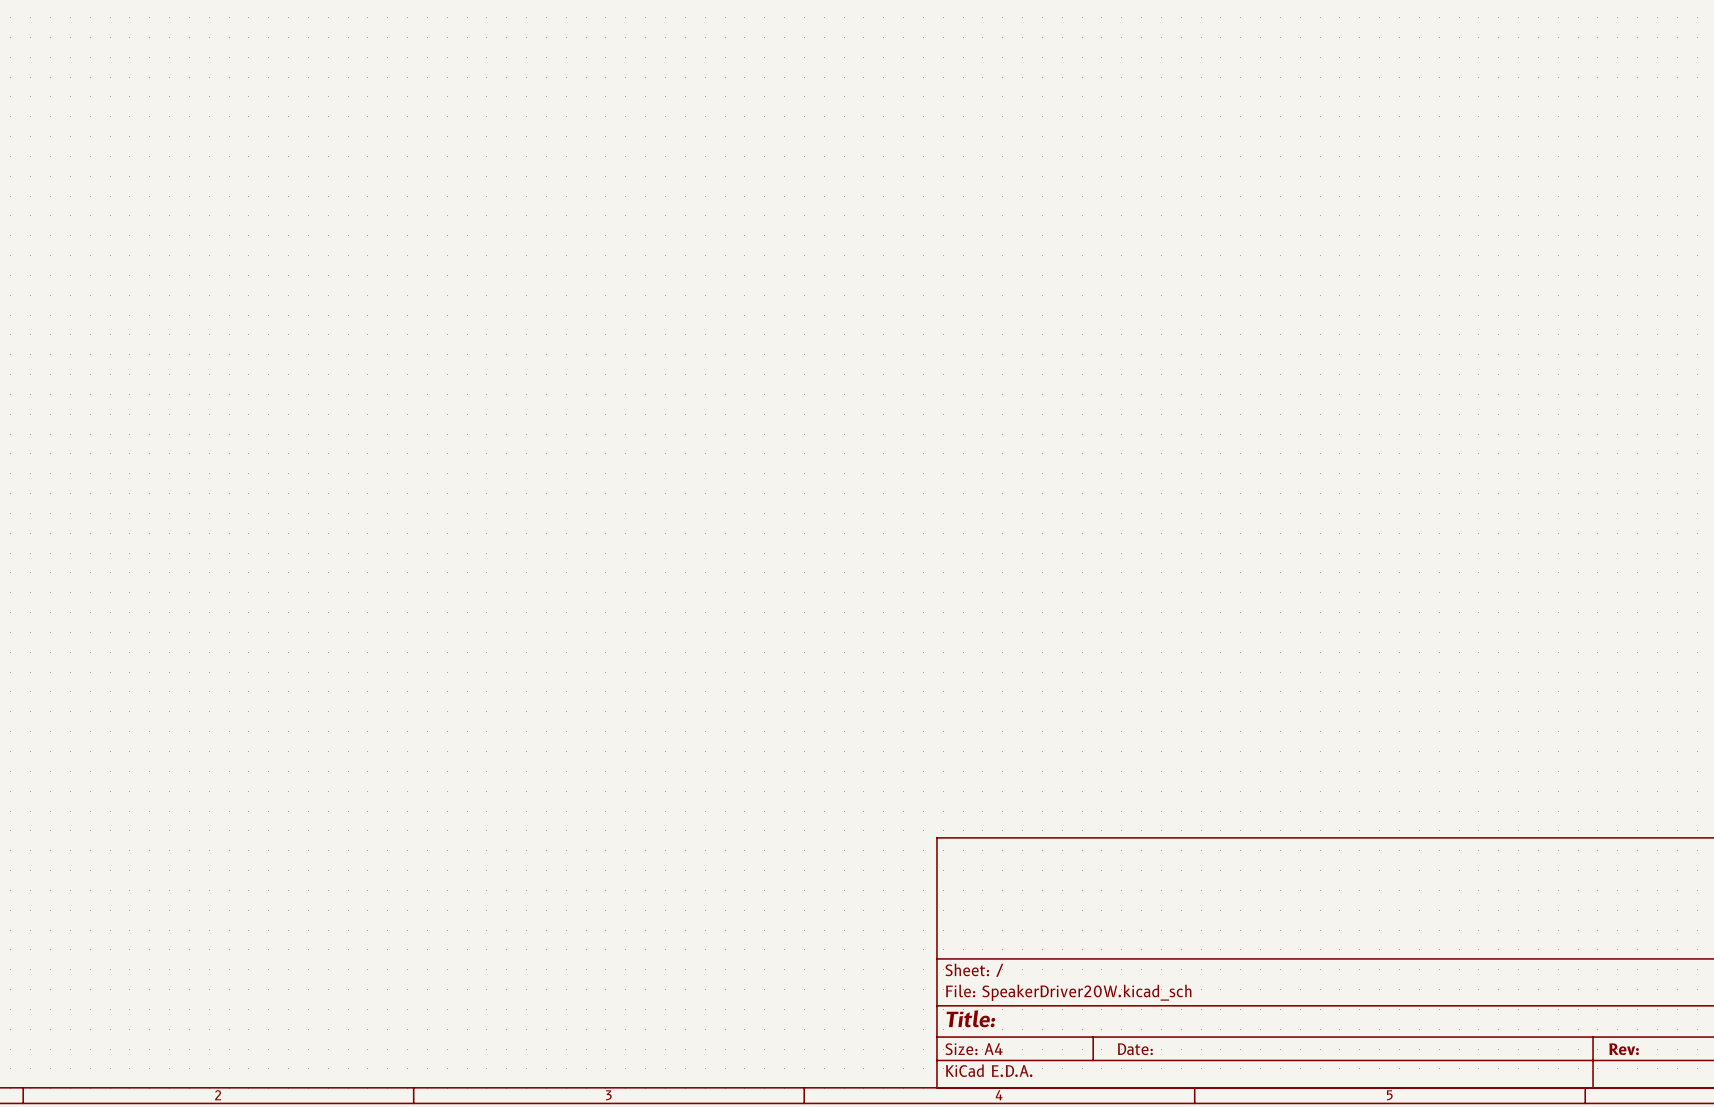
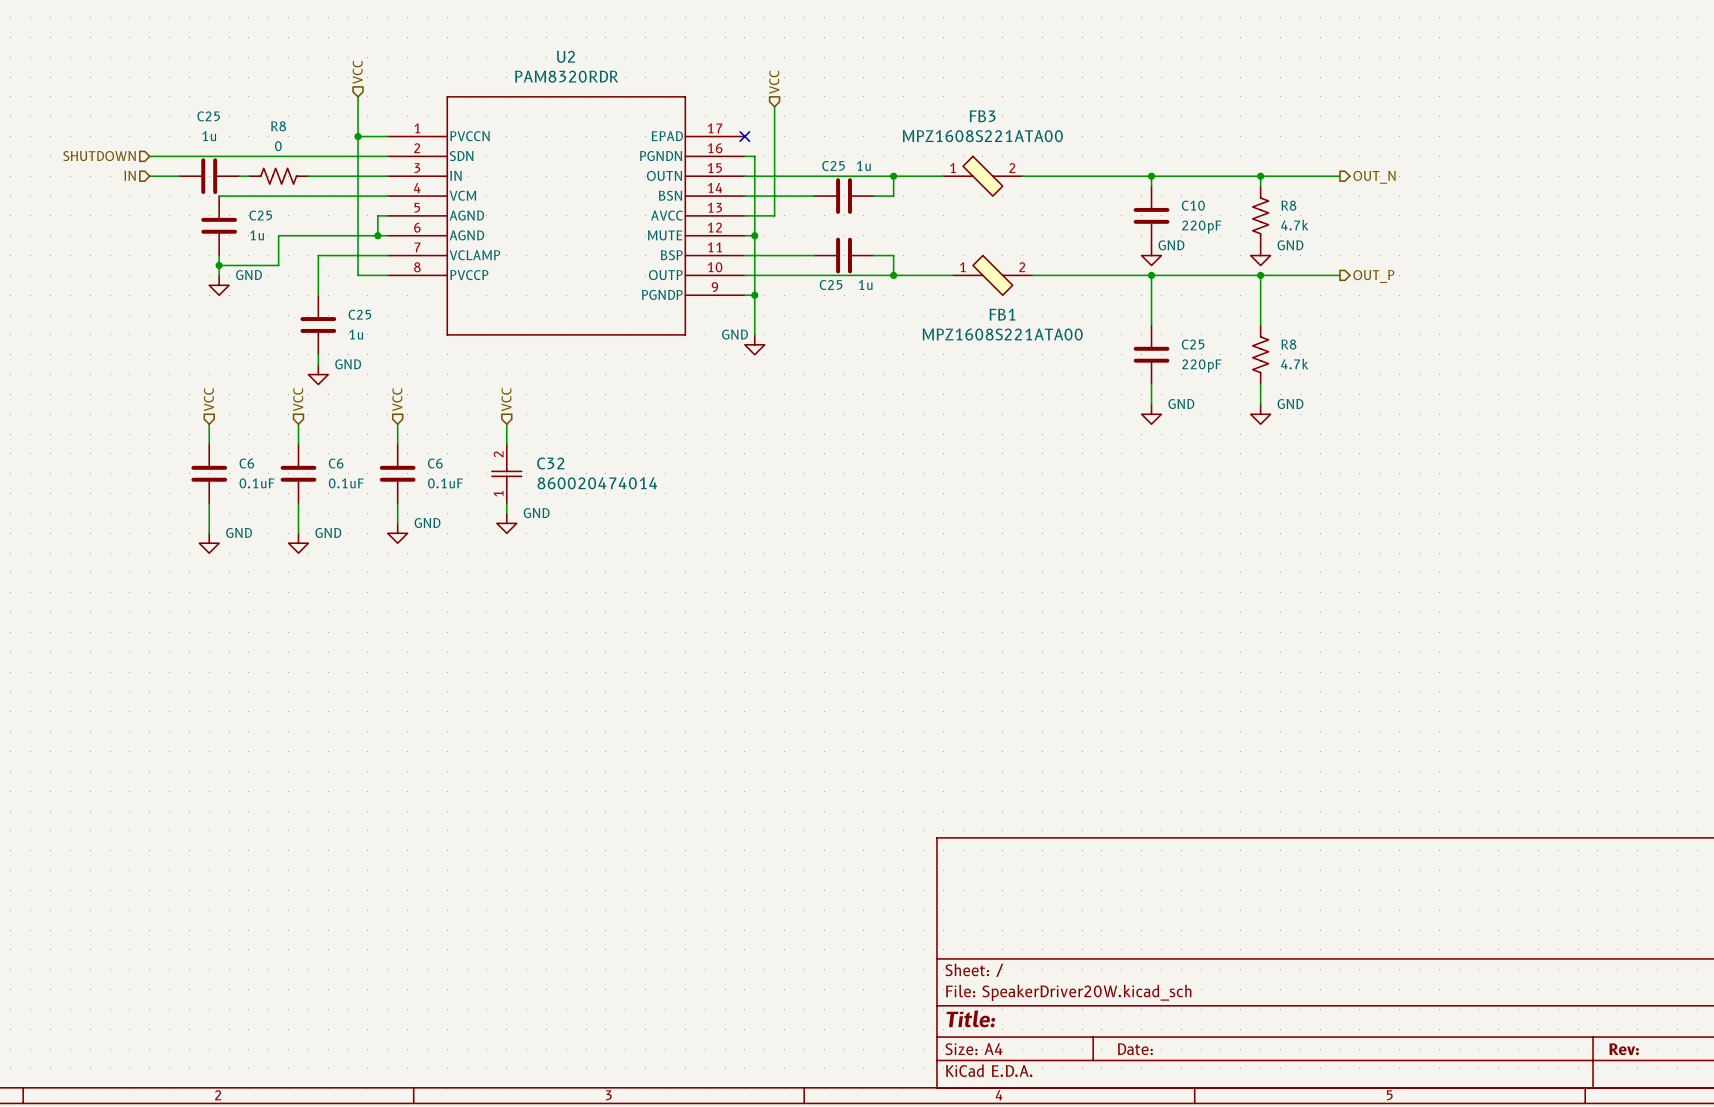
hierarchical label: none -> VCC (357, 72)
hierarchical label: none -> VCC (774, 82)
wire: none -> (358, 96) (358, 275) (387, 275)
wire: none -> (774, 106) (774, 215) (744, 215)
wire: none -> (358, 136) (387, 136)
junction: none -> (358, 136)
no-connect mark: none -> (744, 136)
hierarchical label: none -> SHUTDOWN (99, 156)
wire: none -> (149, 156) (387, 156)
wire: none -> (744, 156) (754, 156) (754, 334)
hierarchical label: none -> IN (130, 175)
wire: none -> (149, 176) (179, 176)
C25: none -> 1u (209, 176)
wire: none -> (238, 176) (248, 176)
R8: none -> 0 (278, 176)
wire: none -> (308, 176) (387, 176)
wire: none -> (744, 176) (943, 176)
wire: none -> (893, 176) (893, 196) (873, 196)
junction: none -> (893, 176)
FB3: none -> MPZ1608S221ATA00 (982, 176)
wire: none -> (1022, 176) (1339, 176)
wire: none -> (1151, 176) (1151, 186)
junction: none -> (1151, 176)
wire: none -> (1260, 176) (1260, 186)
junction: none -> (1260, 176)
hierarchical label: none -> OUT_N (1374, 177)
wire: none -> (219, 196) (387, 196)
wire: none -> (744, 196) (814, 196)
C25: none -> 1u (844, 196)
wire: none -> (387, 215) (377, 215) (377, 235)
U2: none -> PAM8320RDR (566, 215)
C10: none -> 220pF (1151, 215)
R8: none -> 4.7k (1260, 215)
C25: none -> 1u (219, 225)
junction: none -> (377, 235)
wire: none -> (387, 235) (278, 235) (278, 265) (219, 265)
wire: none -> (744, 235) (754, 235)
junction: none -> (754, 235)
wire: none -> (219, 255) (219, 275)
wire: none -> (387, 255) (318, 255) (318, 295)
wire: none -> (744, 255) (814, 255)
C25: none -> 1u (844, 255)
wire: none -> (873, 255) (893, 255) (893, 275)
power symbol: none -> GND (1151, 255)
power symbol: none -> GND (1260, 255)
junction: none -> (219, 265)
wire: none -> (744, 275) (953, 275)
junction: none -> (893, 275)
FB1: none -> MPZ1608S221ATA00 (992, 275)
wire: none -> (1032, 275) (1339, 275)
wire: none -> (1151, 275) (1151, 324)
junction: none -> (1151, 275)
wire: none -> (1260, 275) (1260, 324)
junction: none -> (1260, 275)
hierarchical label: none -> OUT_P (1373, 276)
power symbol: none -> GND (219, 285)
wire: none -> (744, 295) (754, 295)
junction: none -> (754, 295)
C25: none -> 1u (318, 324)
power symbol: none -> GND (754, 344)
wire: none -> (318, 354) (318, 364)
C25: none -> 220pF (1151, 354)
R8: none -> 4.7k (1260, 354)
power symbol: none -> GND (318, 374)
wire: none -> (1151, 384) (1151, 404)
wire: none -> (1260, 384) (1260, 404)
hierarchical label: none -> VCC (208, 399)
hierarchical label: none -> VCC (298, 399)
hierarchical label: none -> VCC (397, 399)
hierarchical label: none -> VCC (506, 399)
power symbol: none -> GND (1151, 414)
power symbol: none -> GND (1260, 414)
wire: none -> (209, 424) (209, 444)
wire: none -> (298, 424) (298, 444)
wire: none -> (397, 424) (397, 444)
wire: none -> (506, 424) (506, 444)
C6: none -> 0.1uF (209, 473)
C6: none -> 0.1uF (298, 473)
C6: none -> 0.1uF (397, 473)
C32: none -> 860020474014 (506, 473)
wire: none -> (209, 503) (209, 533)
wire: none -> (298, 503) (298, 533)
wire: none -> (397, 503) (397, 523)
wire: none -> (506, 503) (506, 513)
power symbol: none -> GND (506, 523)
power symbol: none -> GND (397, 533)
power symbol: none -> GND (209, 543)
power symbol: none -> GND (298, 543)

